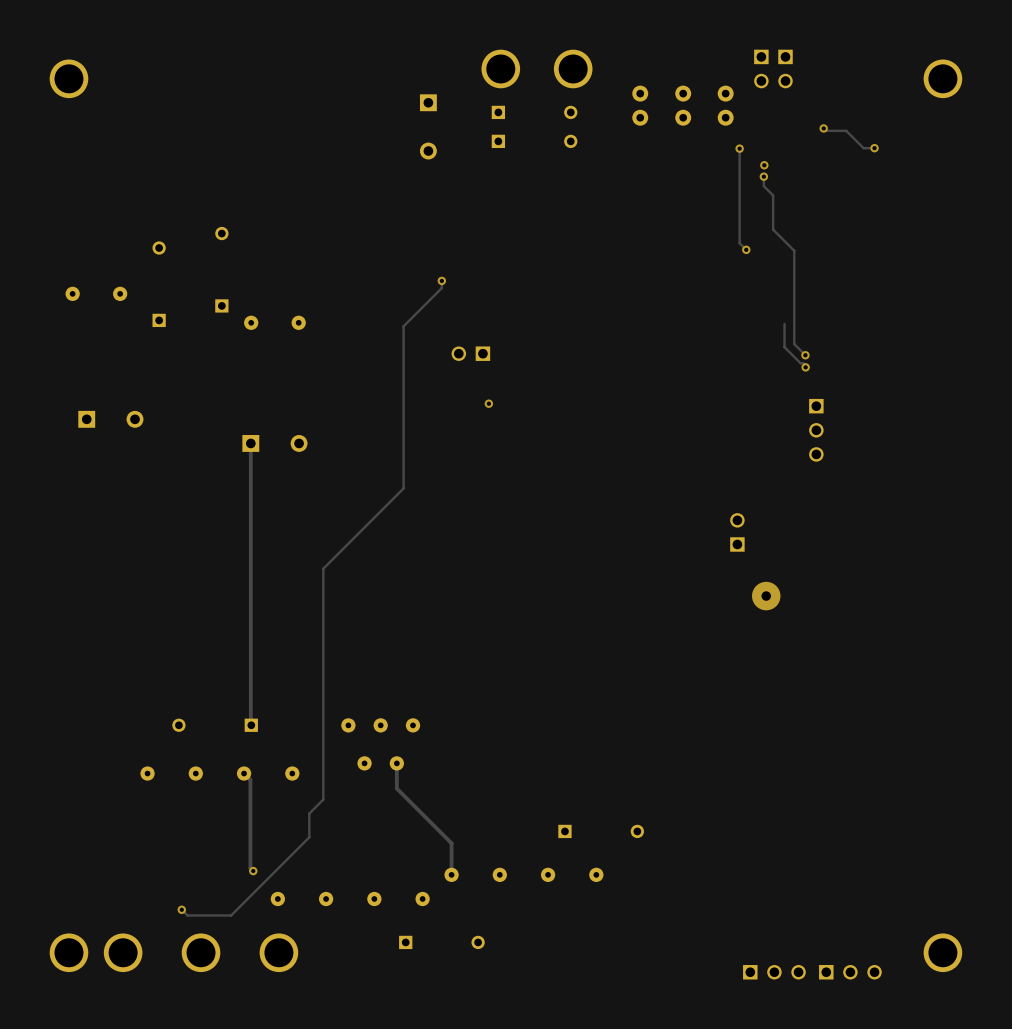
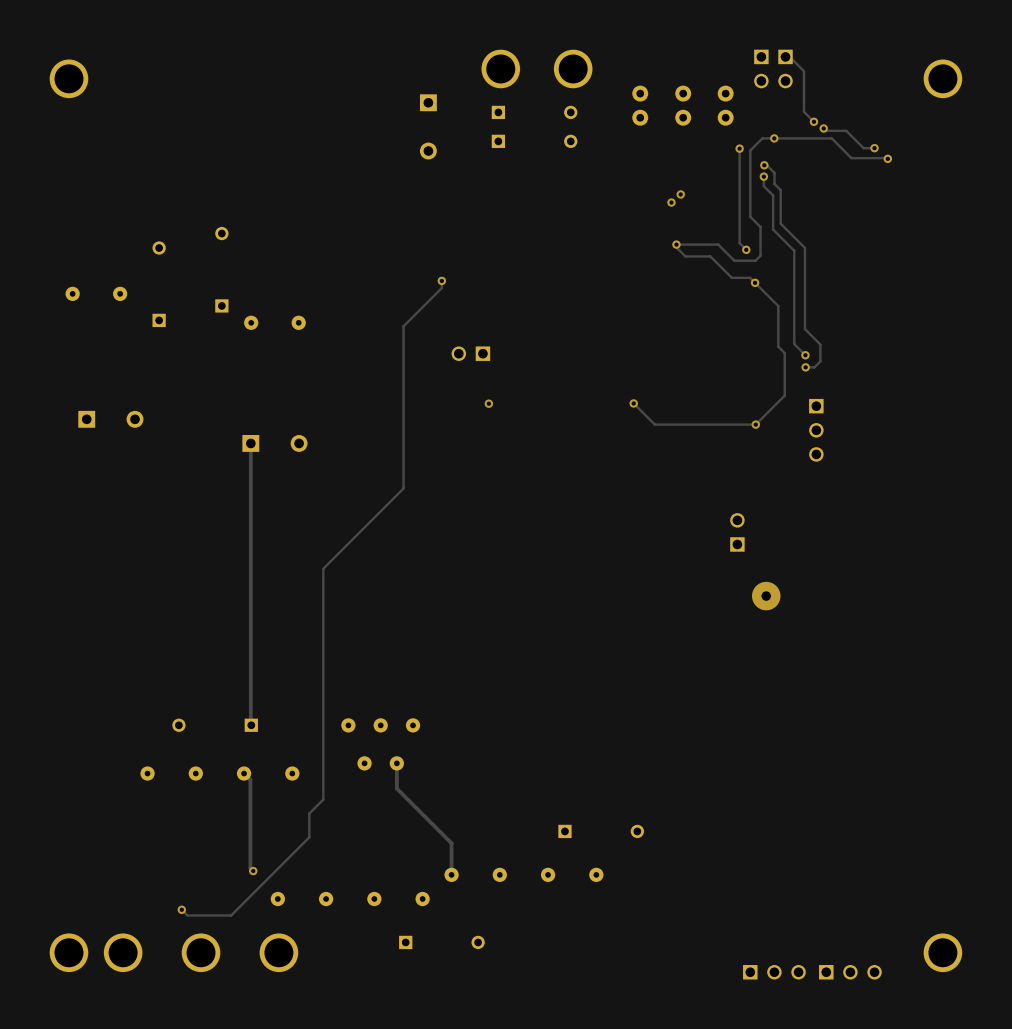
track: none -> (785, 56) (789, 56) (803, 71) (803, 111) (813, 121)
via: none -> (813, 121)
via: none -> (774, 138)
track: none -> (887, 158) (851, 158) (831, 138) (762, 138) (750, 150) (750, 216) (760, 227) (760, 255) (755, 260) (734, 260) (718, 244) (676, 244) (676, 247) (685, 256) (710, 256) (731, 277) (750, 277) (778, 306) (778, 346) (784, 353) (784, 395) (755, 424) (654, 424) (633, 403)
via: none -> (887, 158)
via: none -> (680, 194)
via: none -> (671, 202)
via: none -> (676, 244)
via: none -> (755, 282)
track: (784, 323) (784, 347) (800, 363) (807, 367) -> (764, 165) (766, 165) (774, 172) (774, 184) (780, 190) (780, 223) (804, 247) (804, 329) (820, 344) (820, 361) (814, 367) (807, 367)
via: none -> (633, 403)
via: none -> (755, 424)

